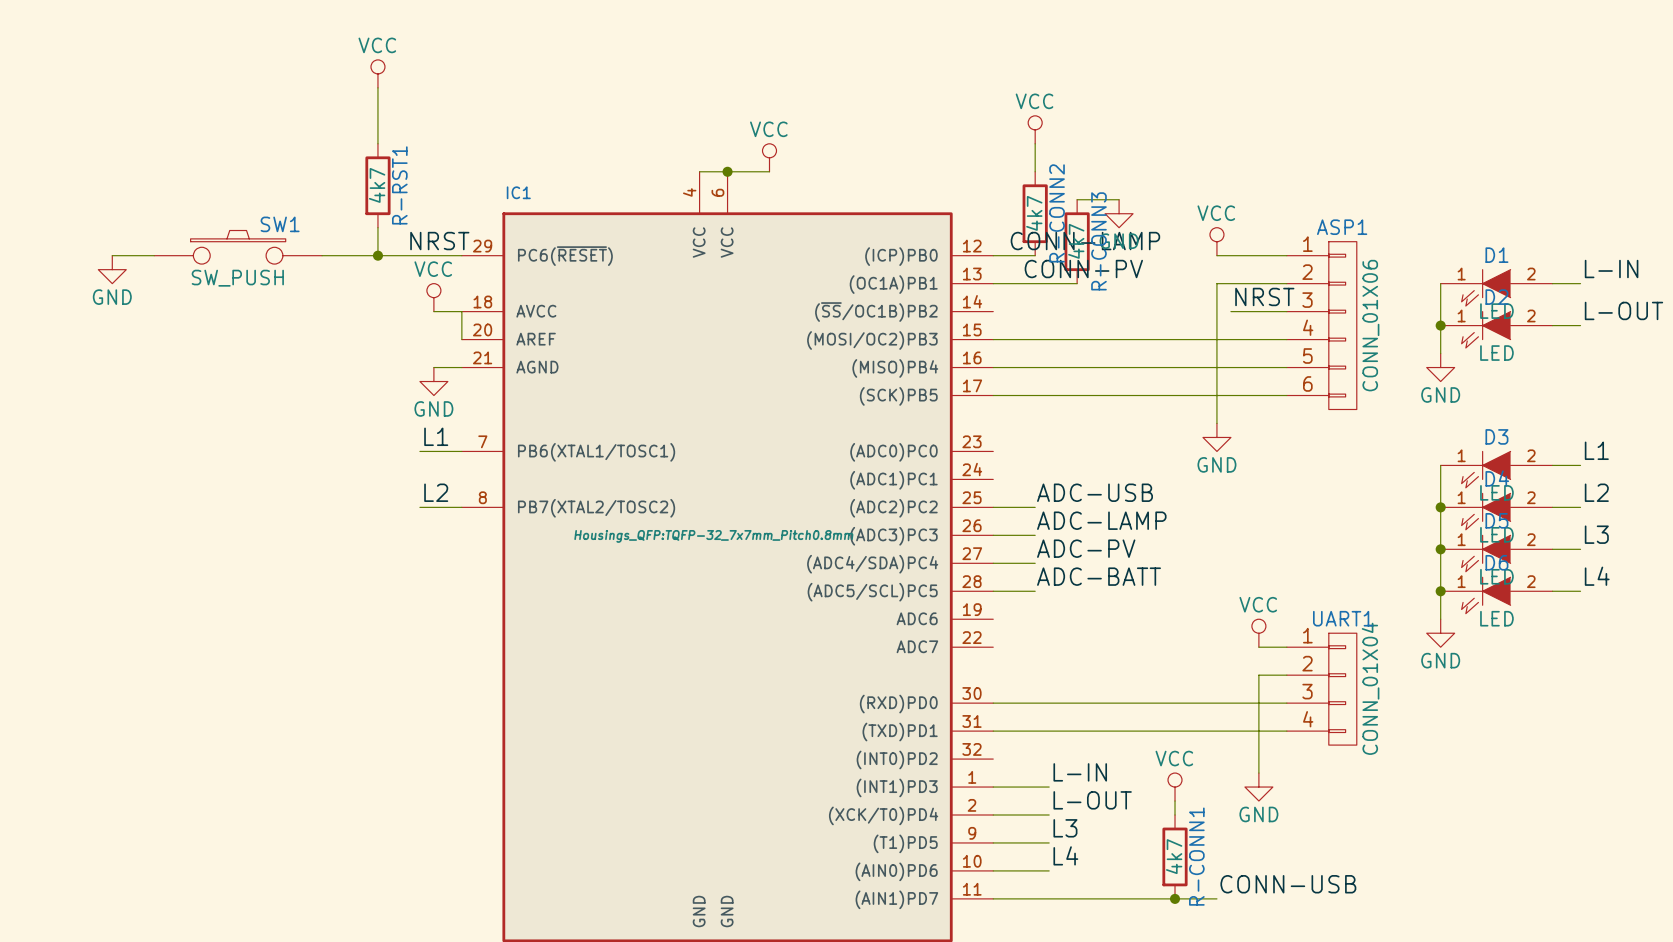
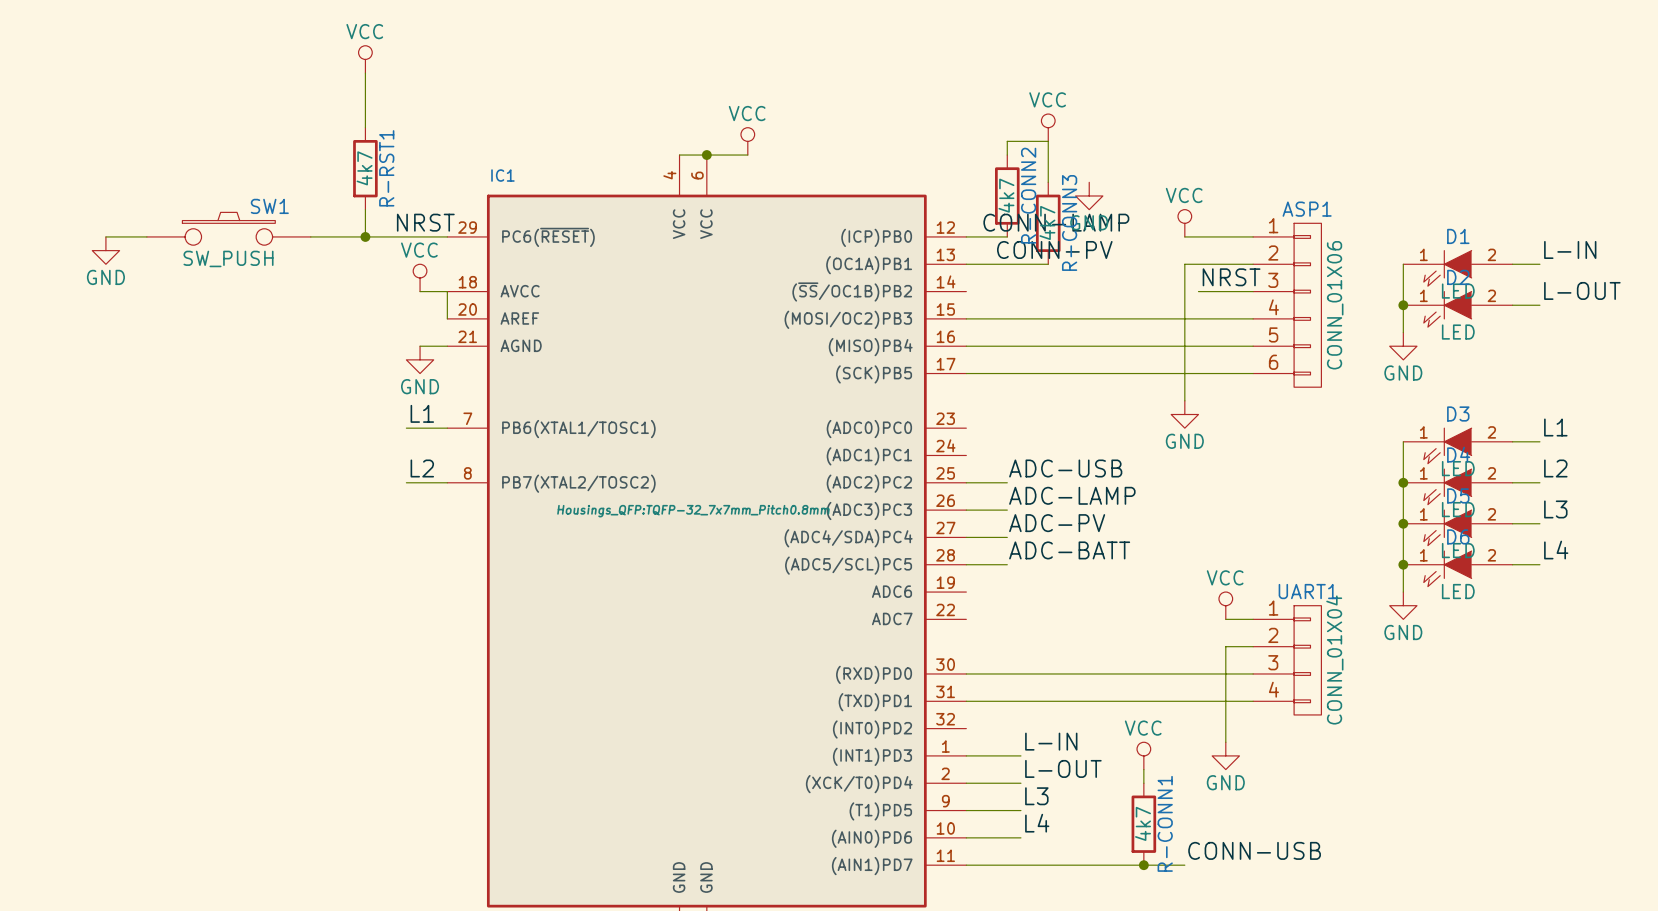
power symbol position: VCC (1035, 129) -> VCC (1048, 127)
wire: (1035, 143) (1035, 157) -> (1048, 182) (1048, 141) (1007, 141)
wire: (1077, 199) (1119, 199) -> none

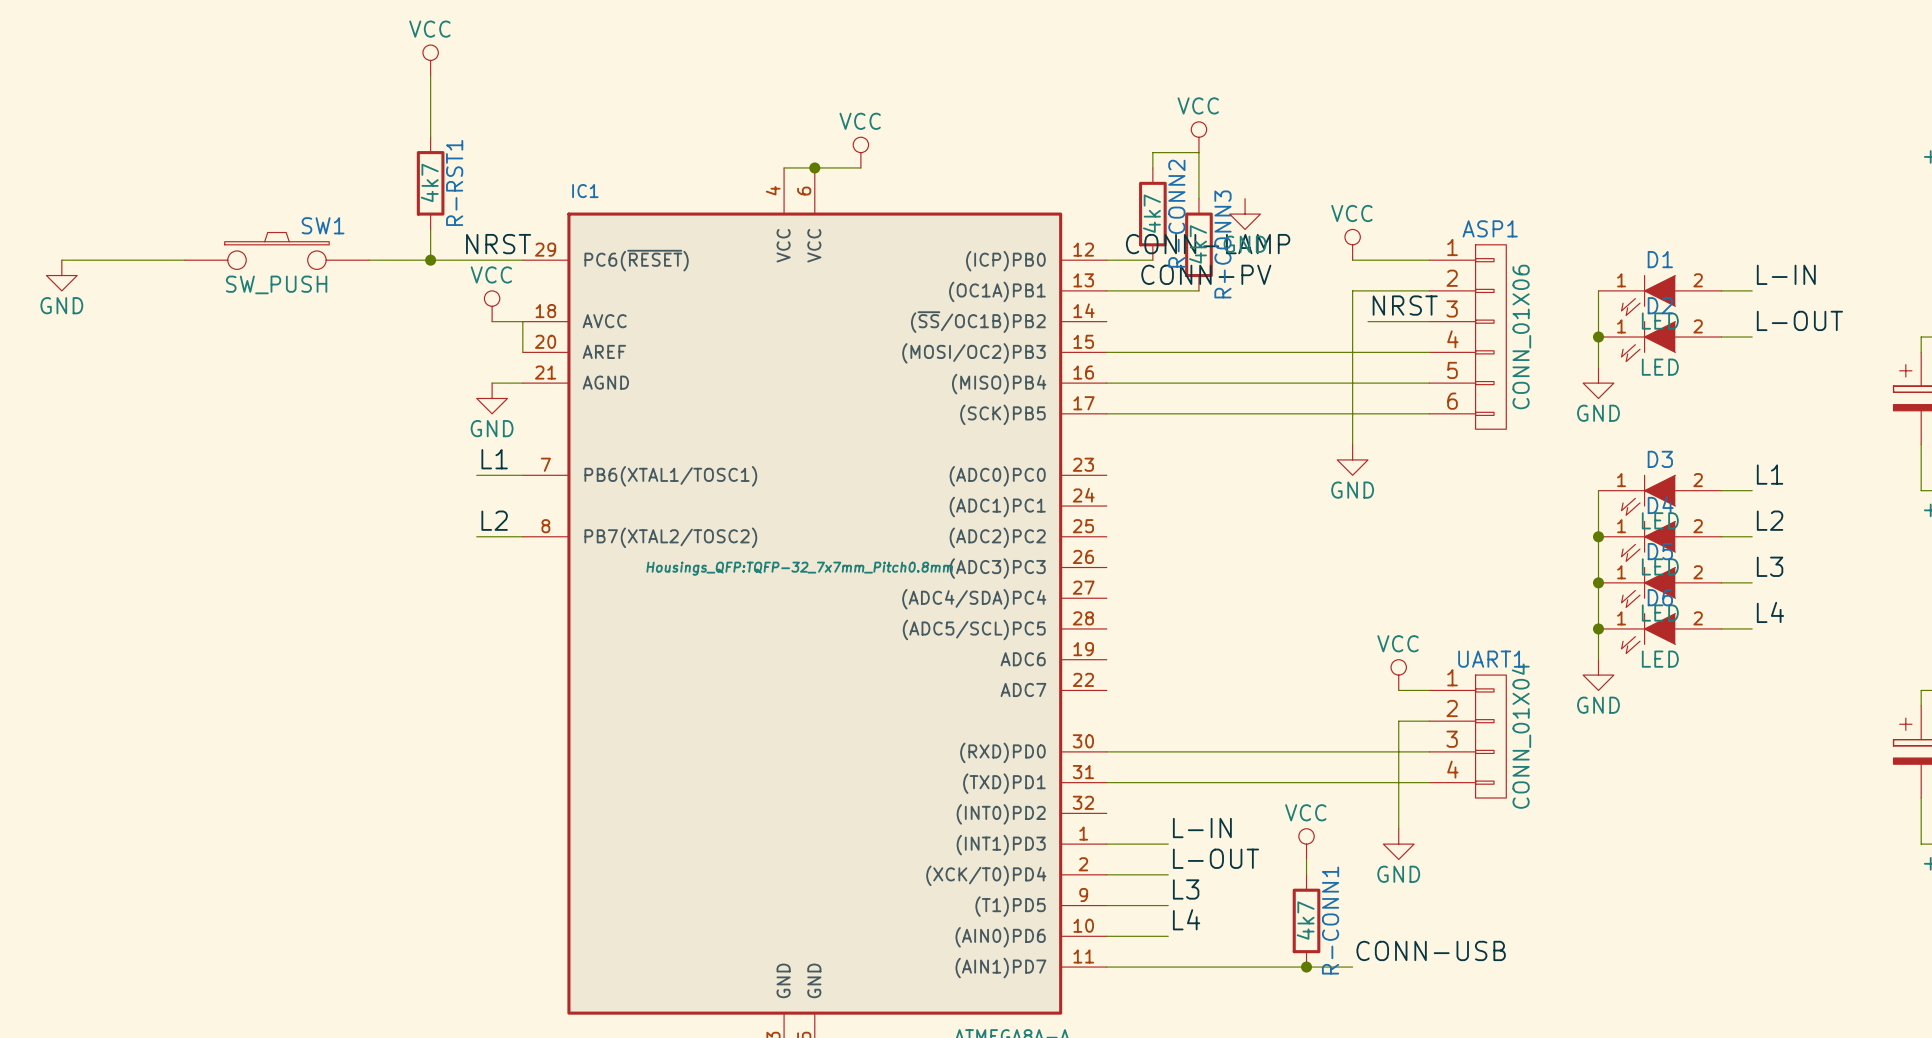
wire: none -> (61, 260) (138, 260)
power symbol position: GND (105, 250) -> GND (61, 275)
label: ADC-USB (1065, 468) -> none
wire: (966, 482) (1007, 482) -> none
label: ADC-LAMP (1072, 495) -> none
wire: (966, 510) (1007, 510) -> none
label: ADC-PV (1057, 523) -> none
wire: (966, 537) (1007, 537) -> none
label: ADC-BATT (1069, 550) -> none
wire: (966, 564) (1007, 564) -> none

